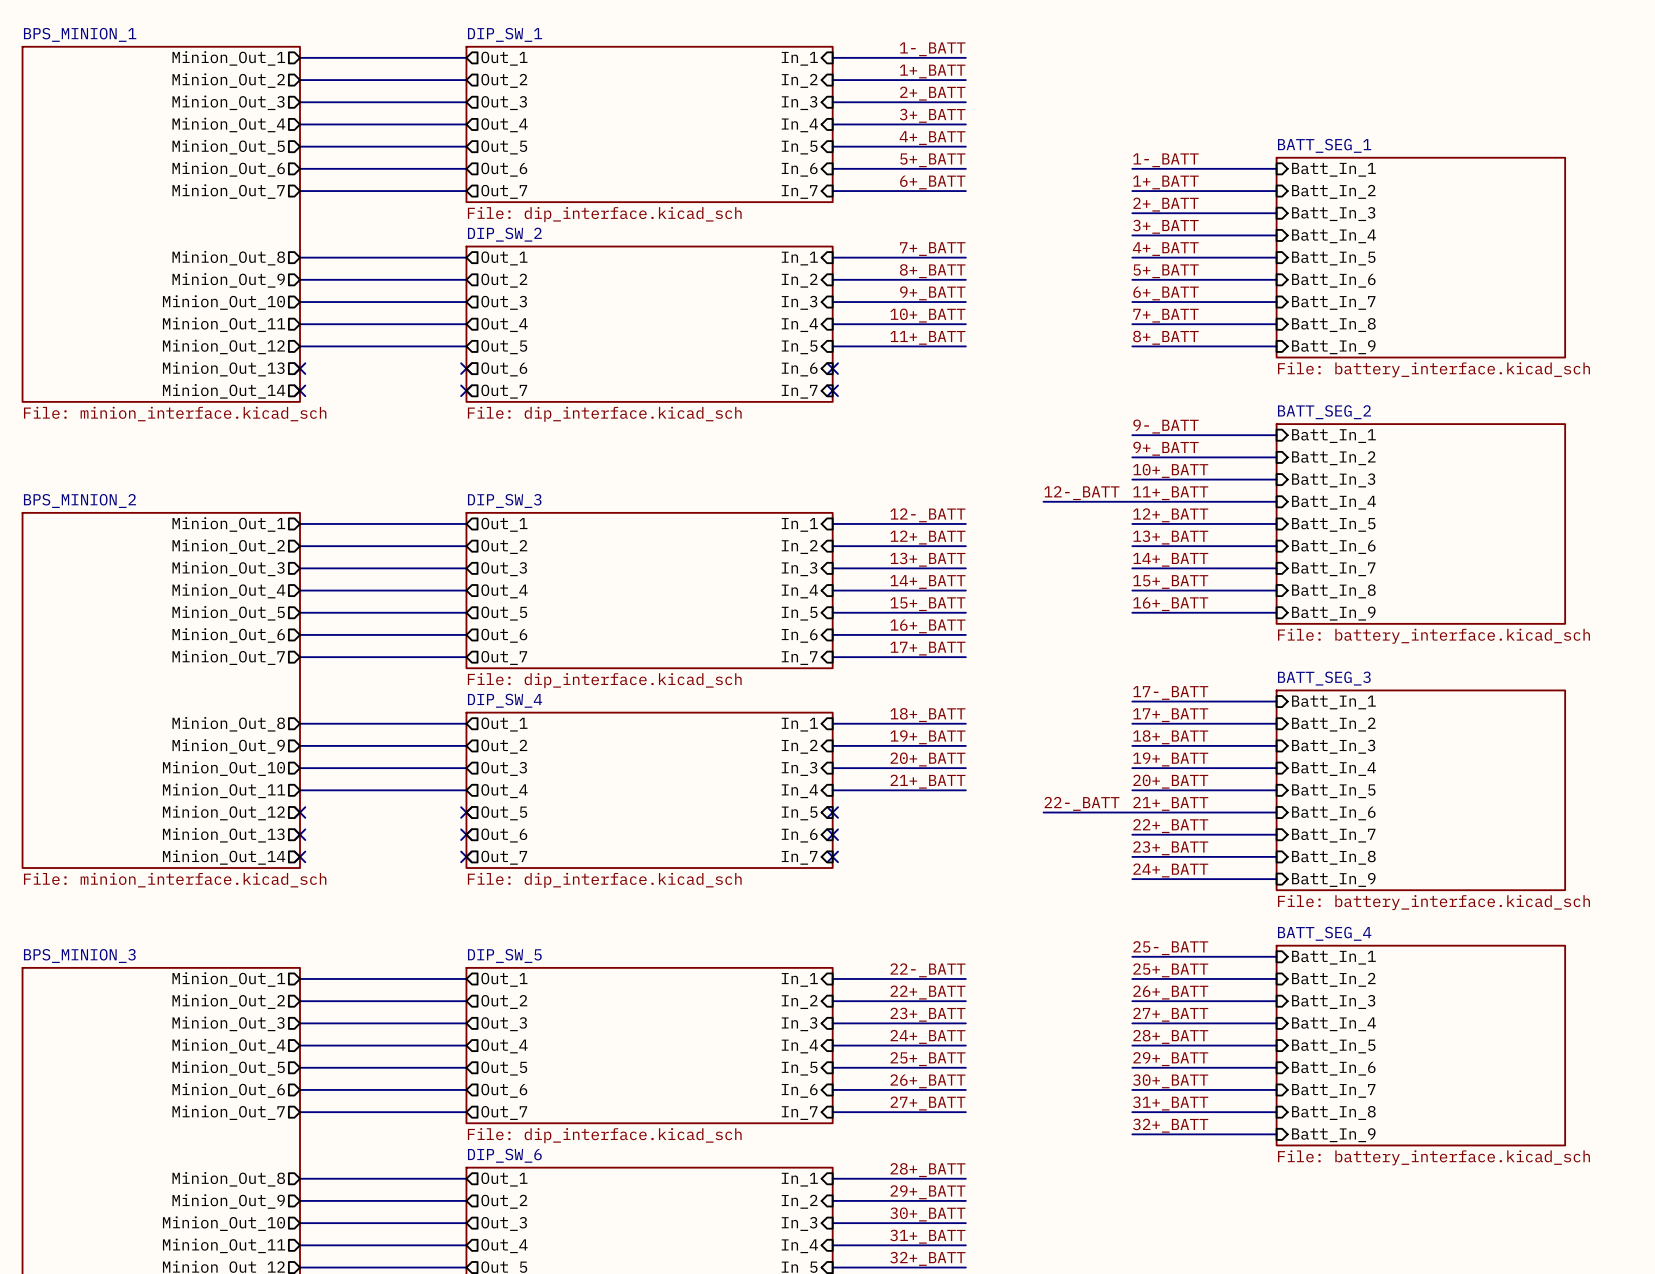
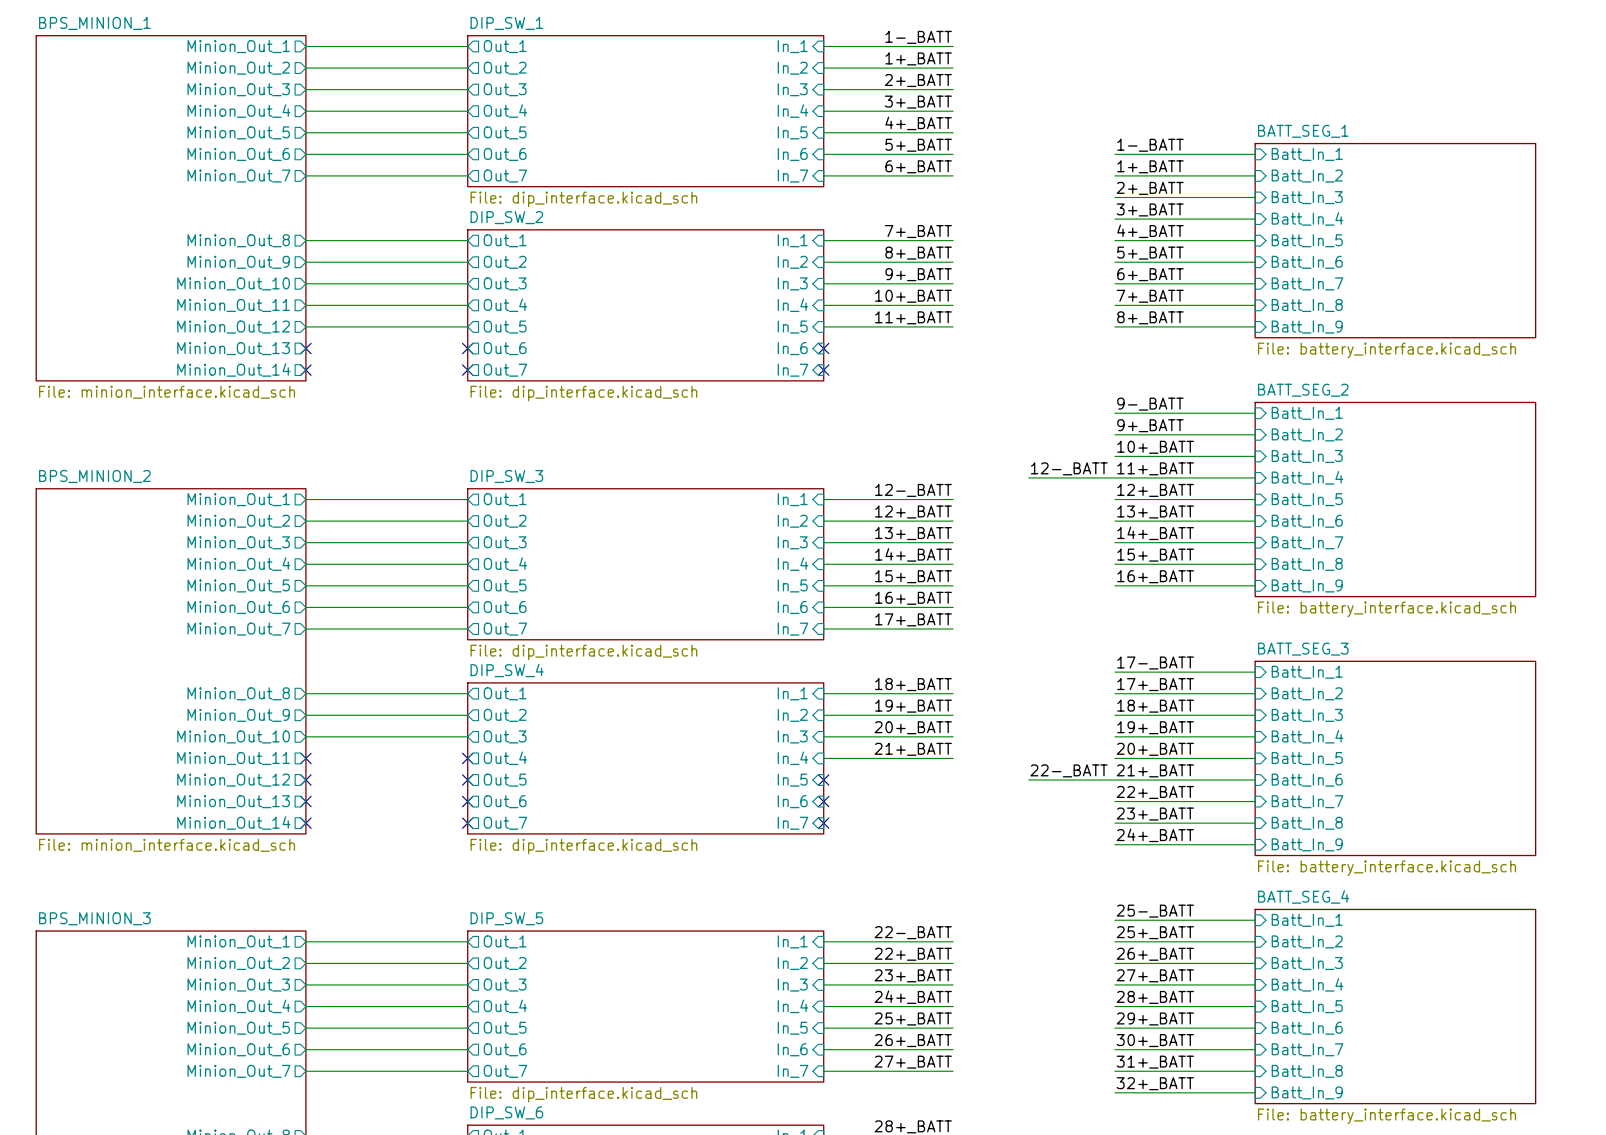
wire: (299, 790) (466, 790) -> none
no-connect mark: none -> (305, 758)
no-connect mark: none -> (467, 758)

